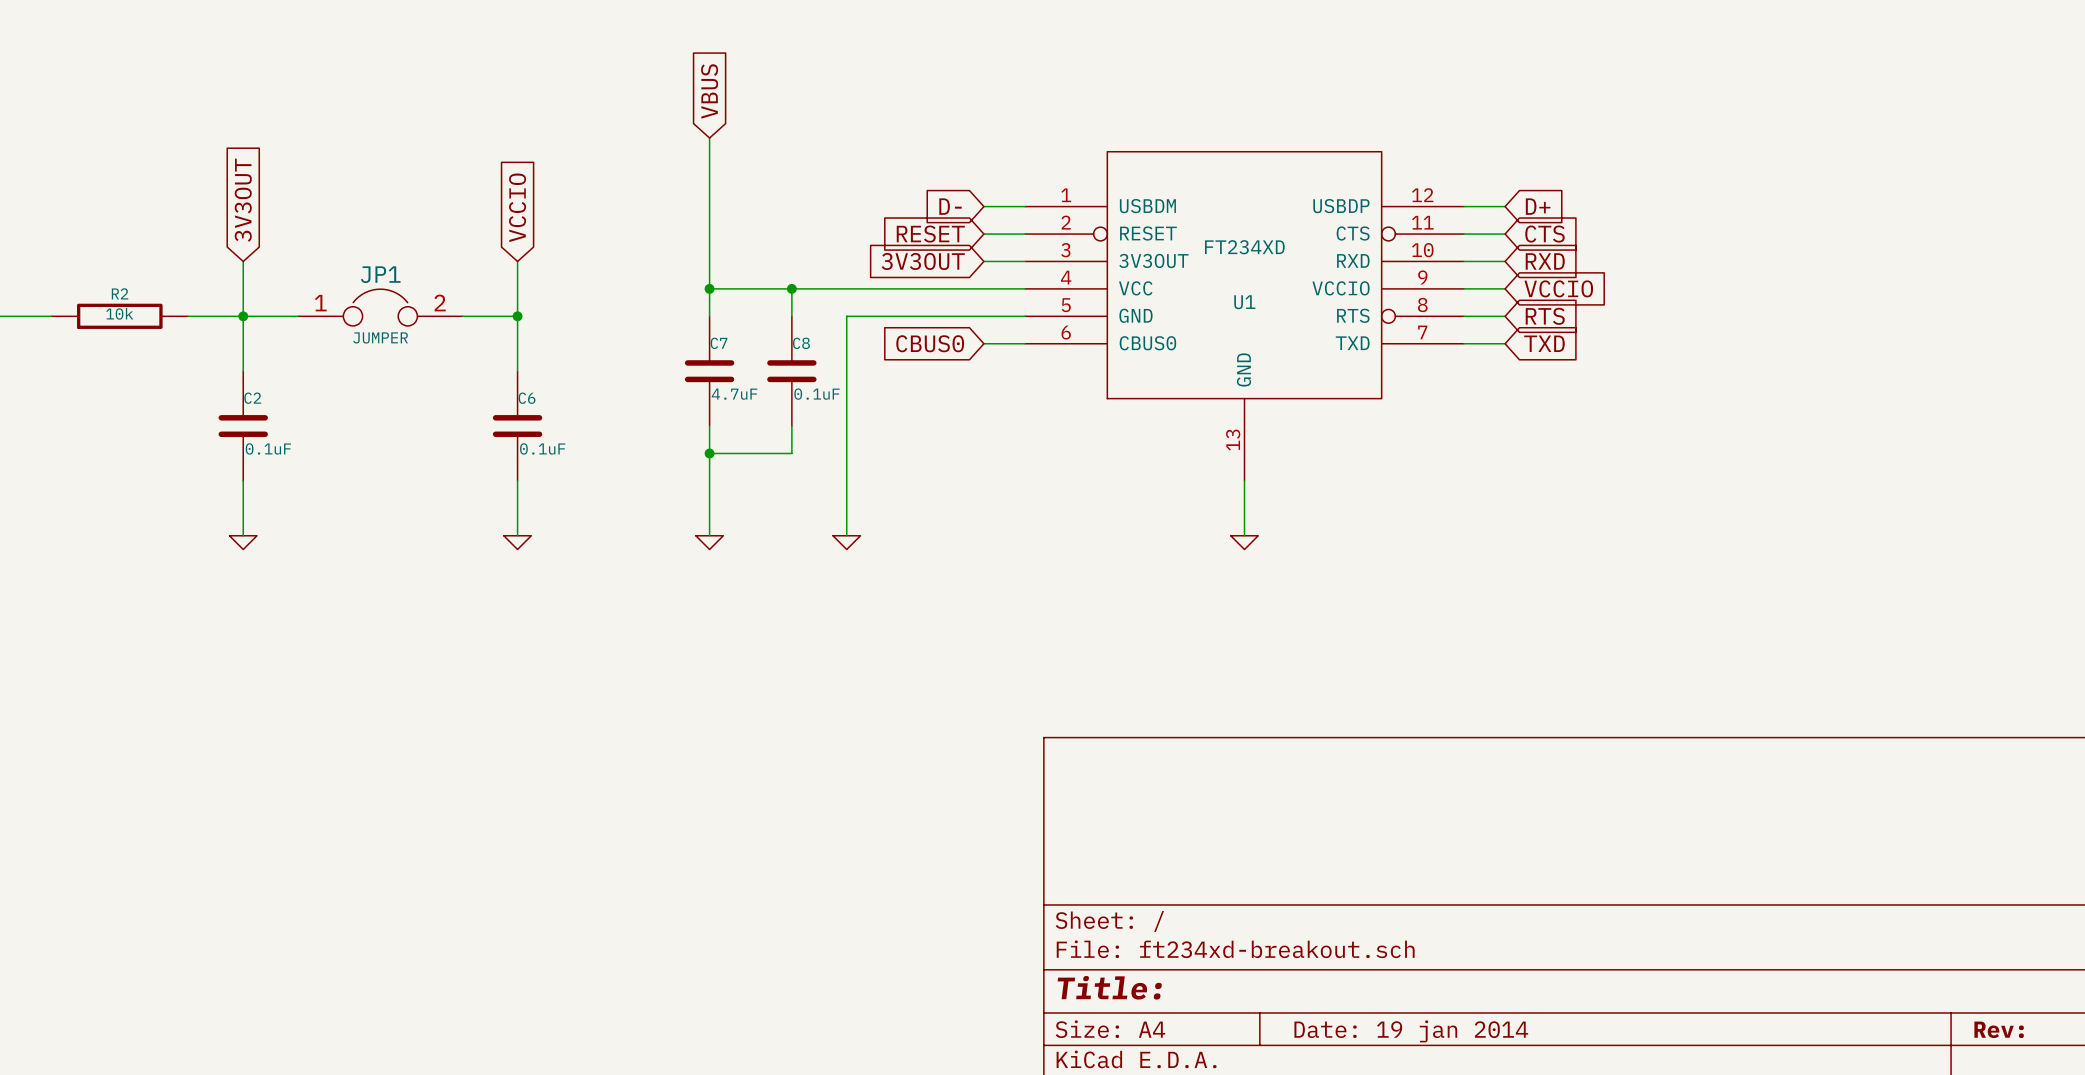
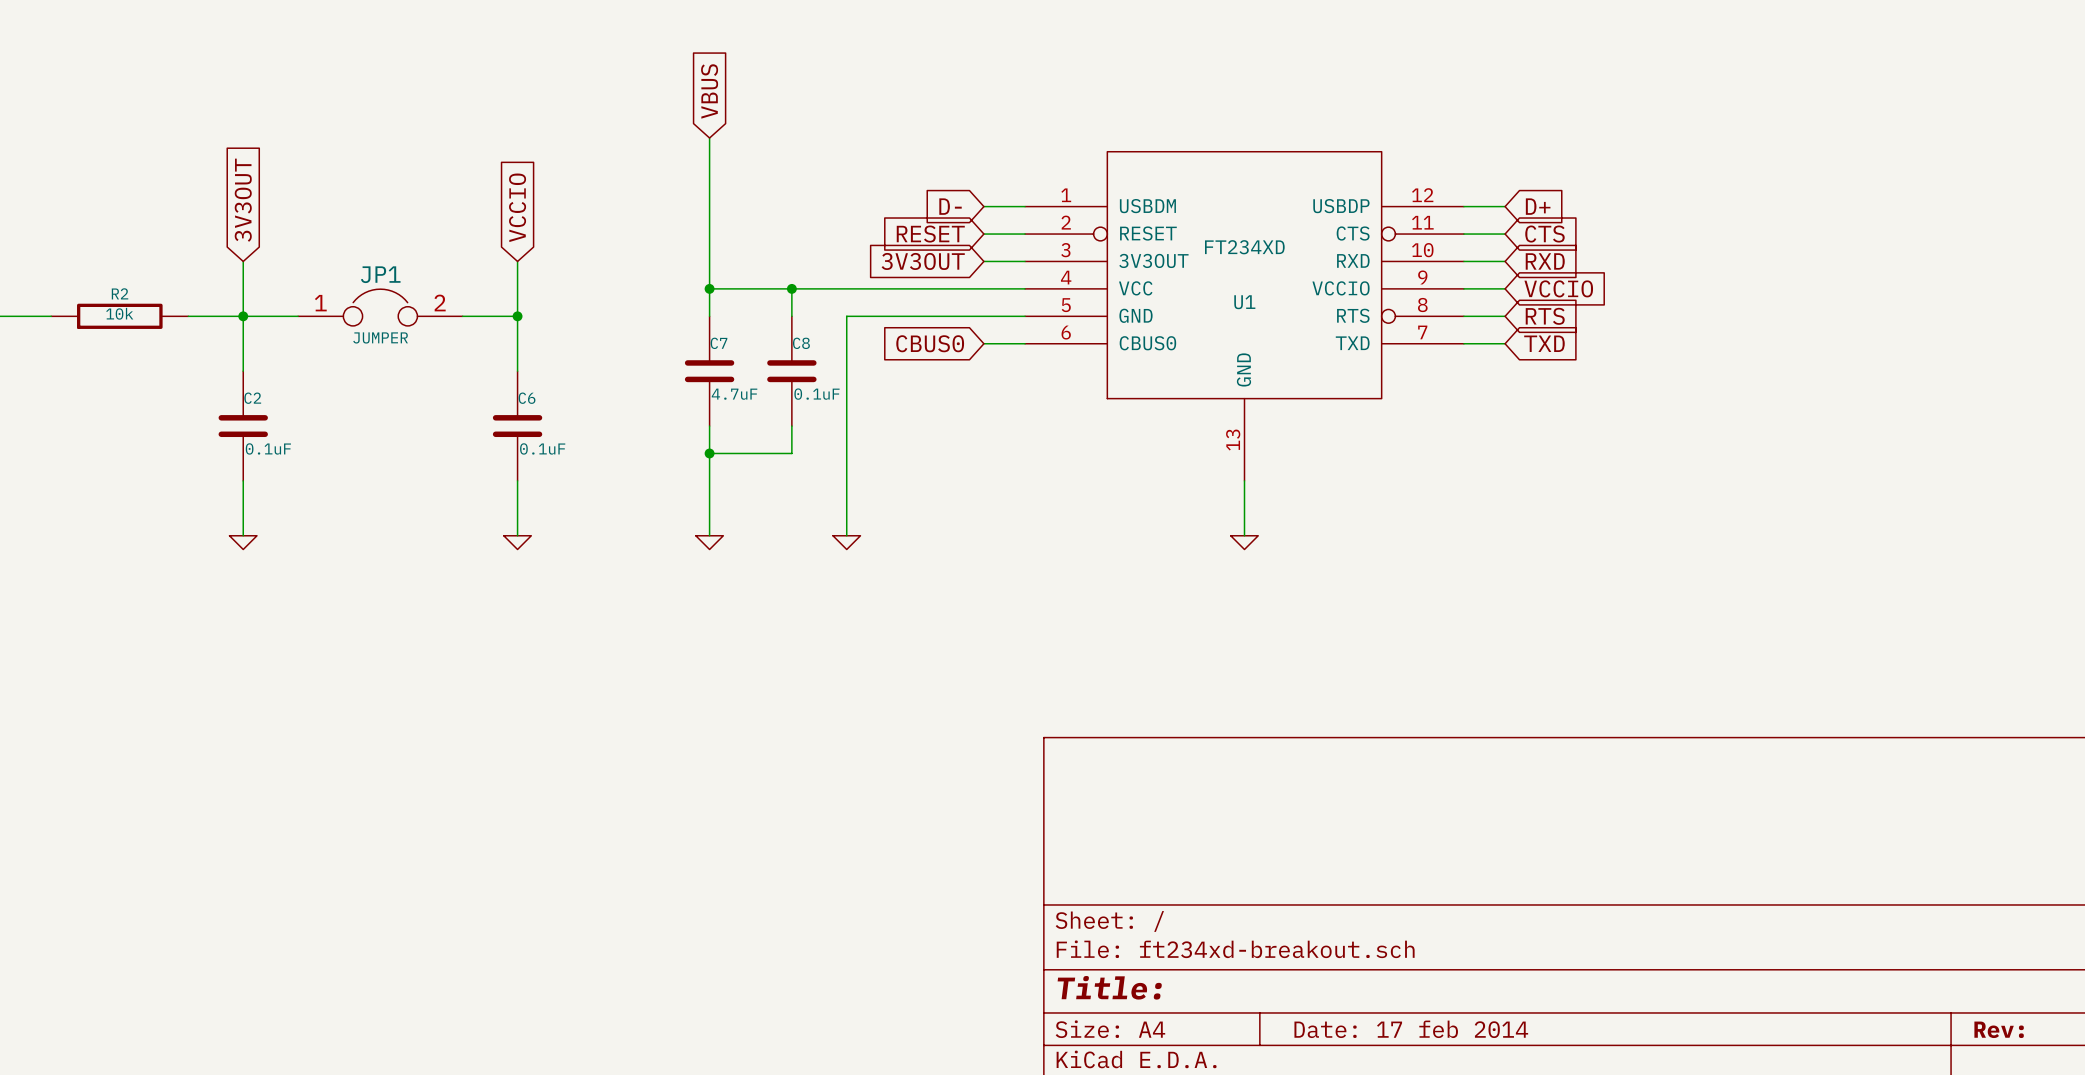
title block: Date: 19 jan 2014 (1411, 1031) -> Date: 17 feb 2014 (1411, 1029)

